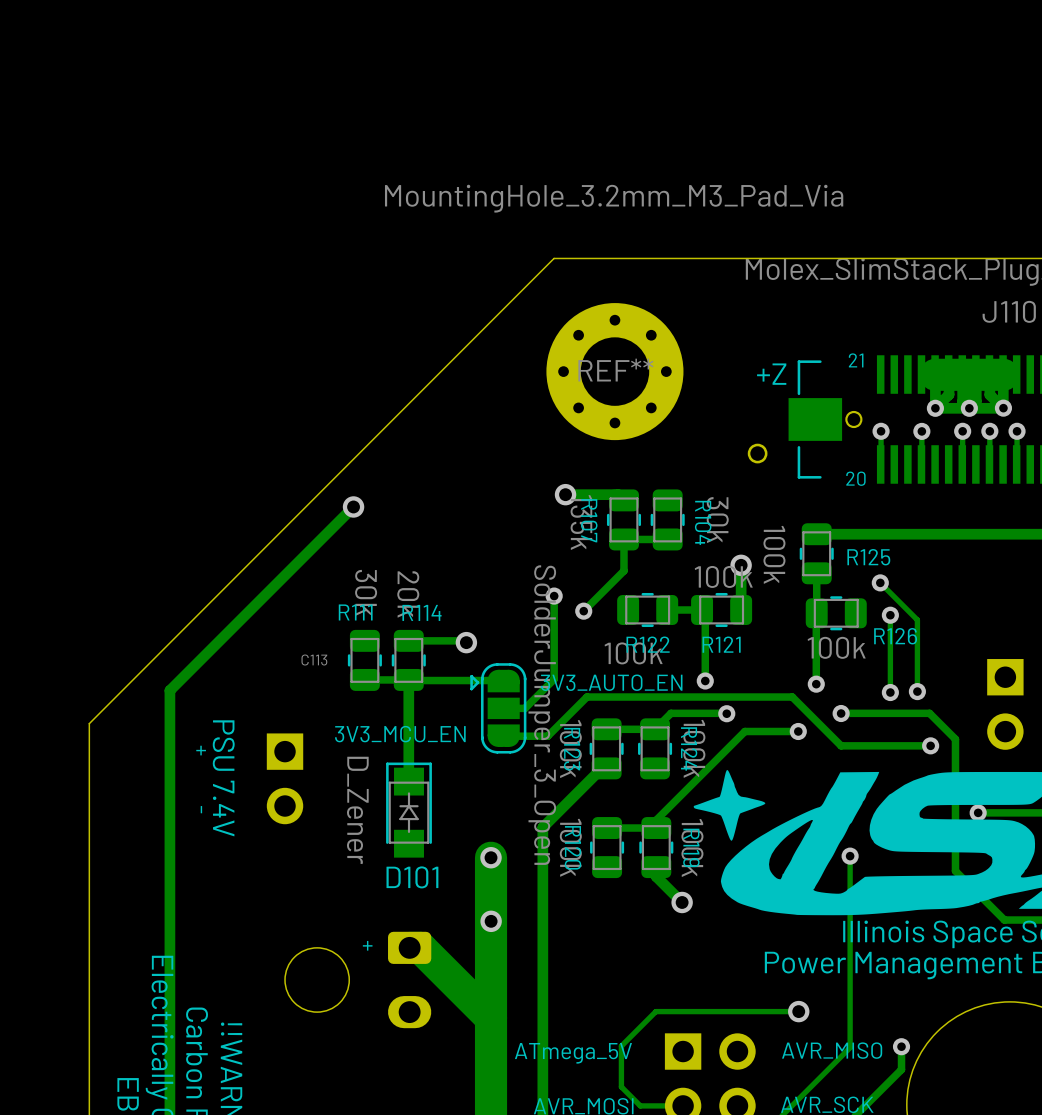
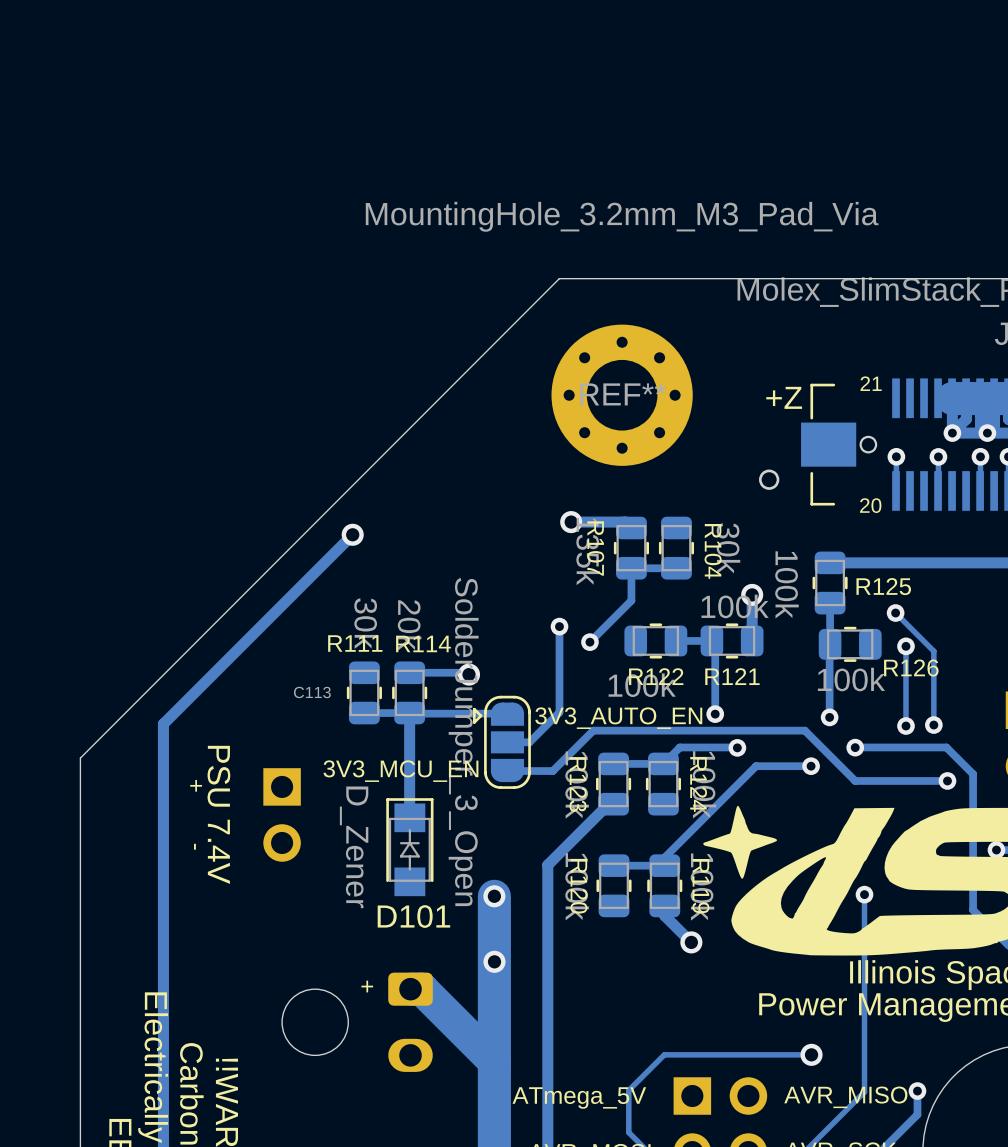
part value position: SolderJumper_3_Open (542, 715) -> SolderJumper_3_Open (463, 742)

